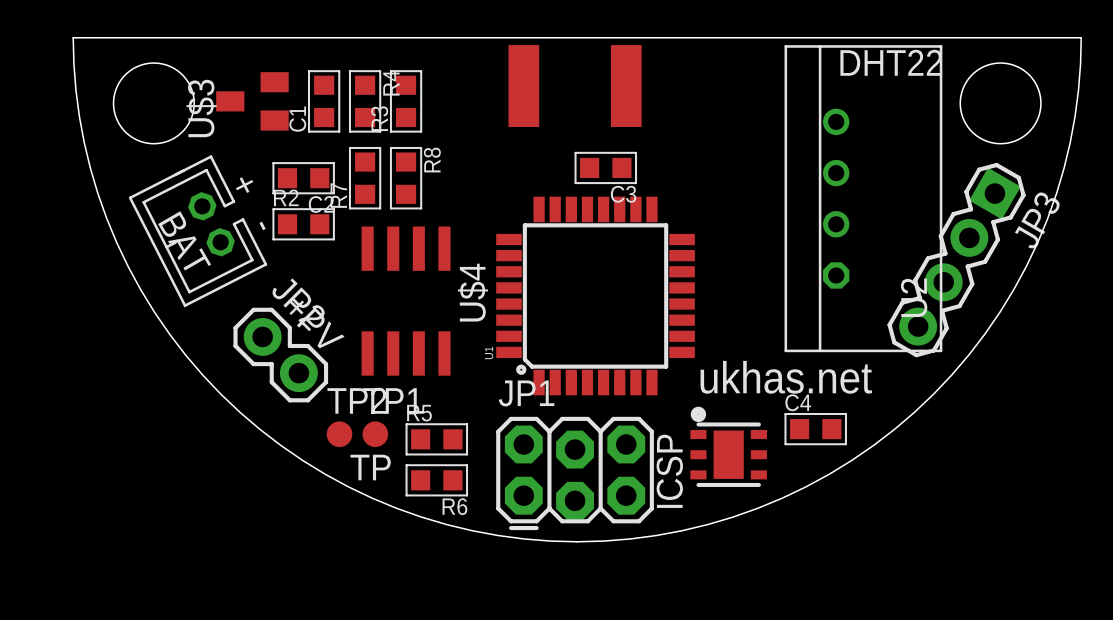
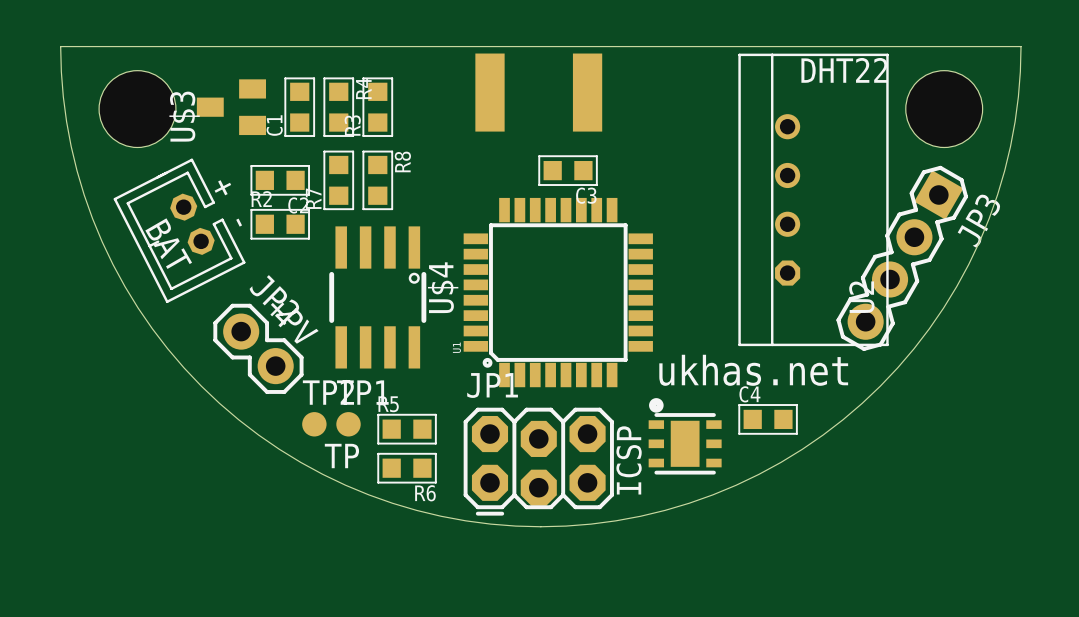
U$4 footprint: [361, 226, 451, 376] -> [329, 226, 427, 369]

